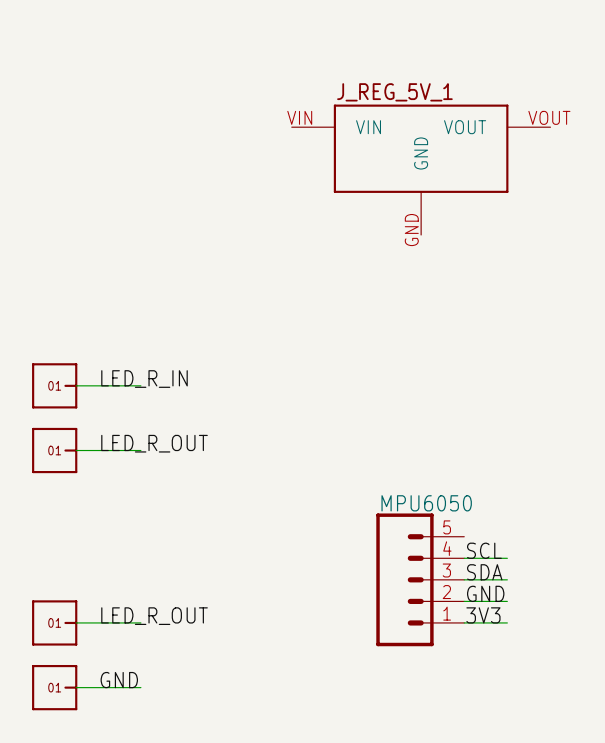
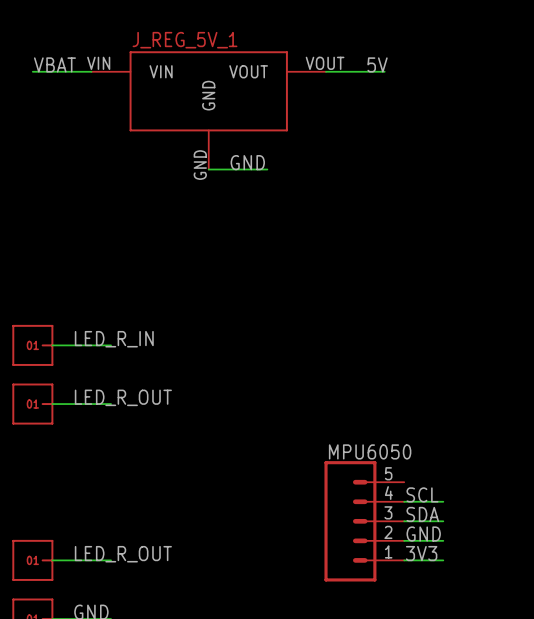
label: none -> VBAT (54, 64)
label: none -> 5V (377, 64)
wire: none -> (32, 71) (91, 71)
wire: none -> (326, 71) (384, 71)
J_REG_5V_1 position: (421, 169) -> (208, 110)
label: none -> GND (247, 162)
wire: none -> (208, 169) (267, 169)

